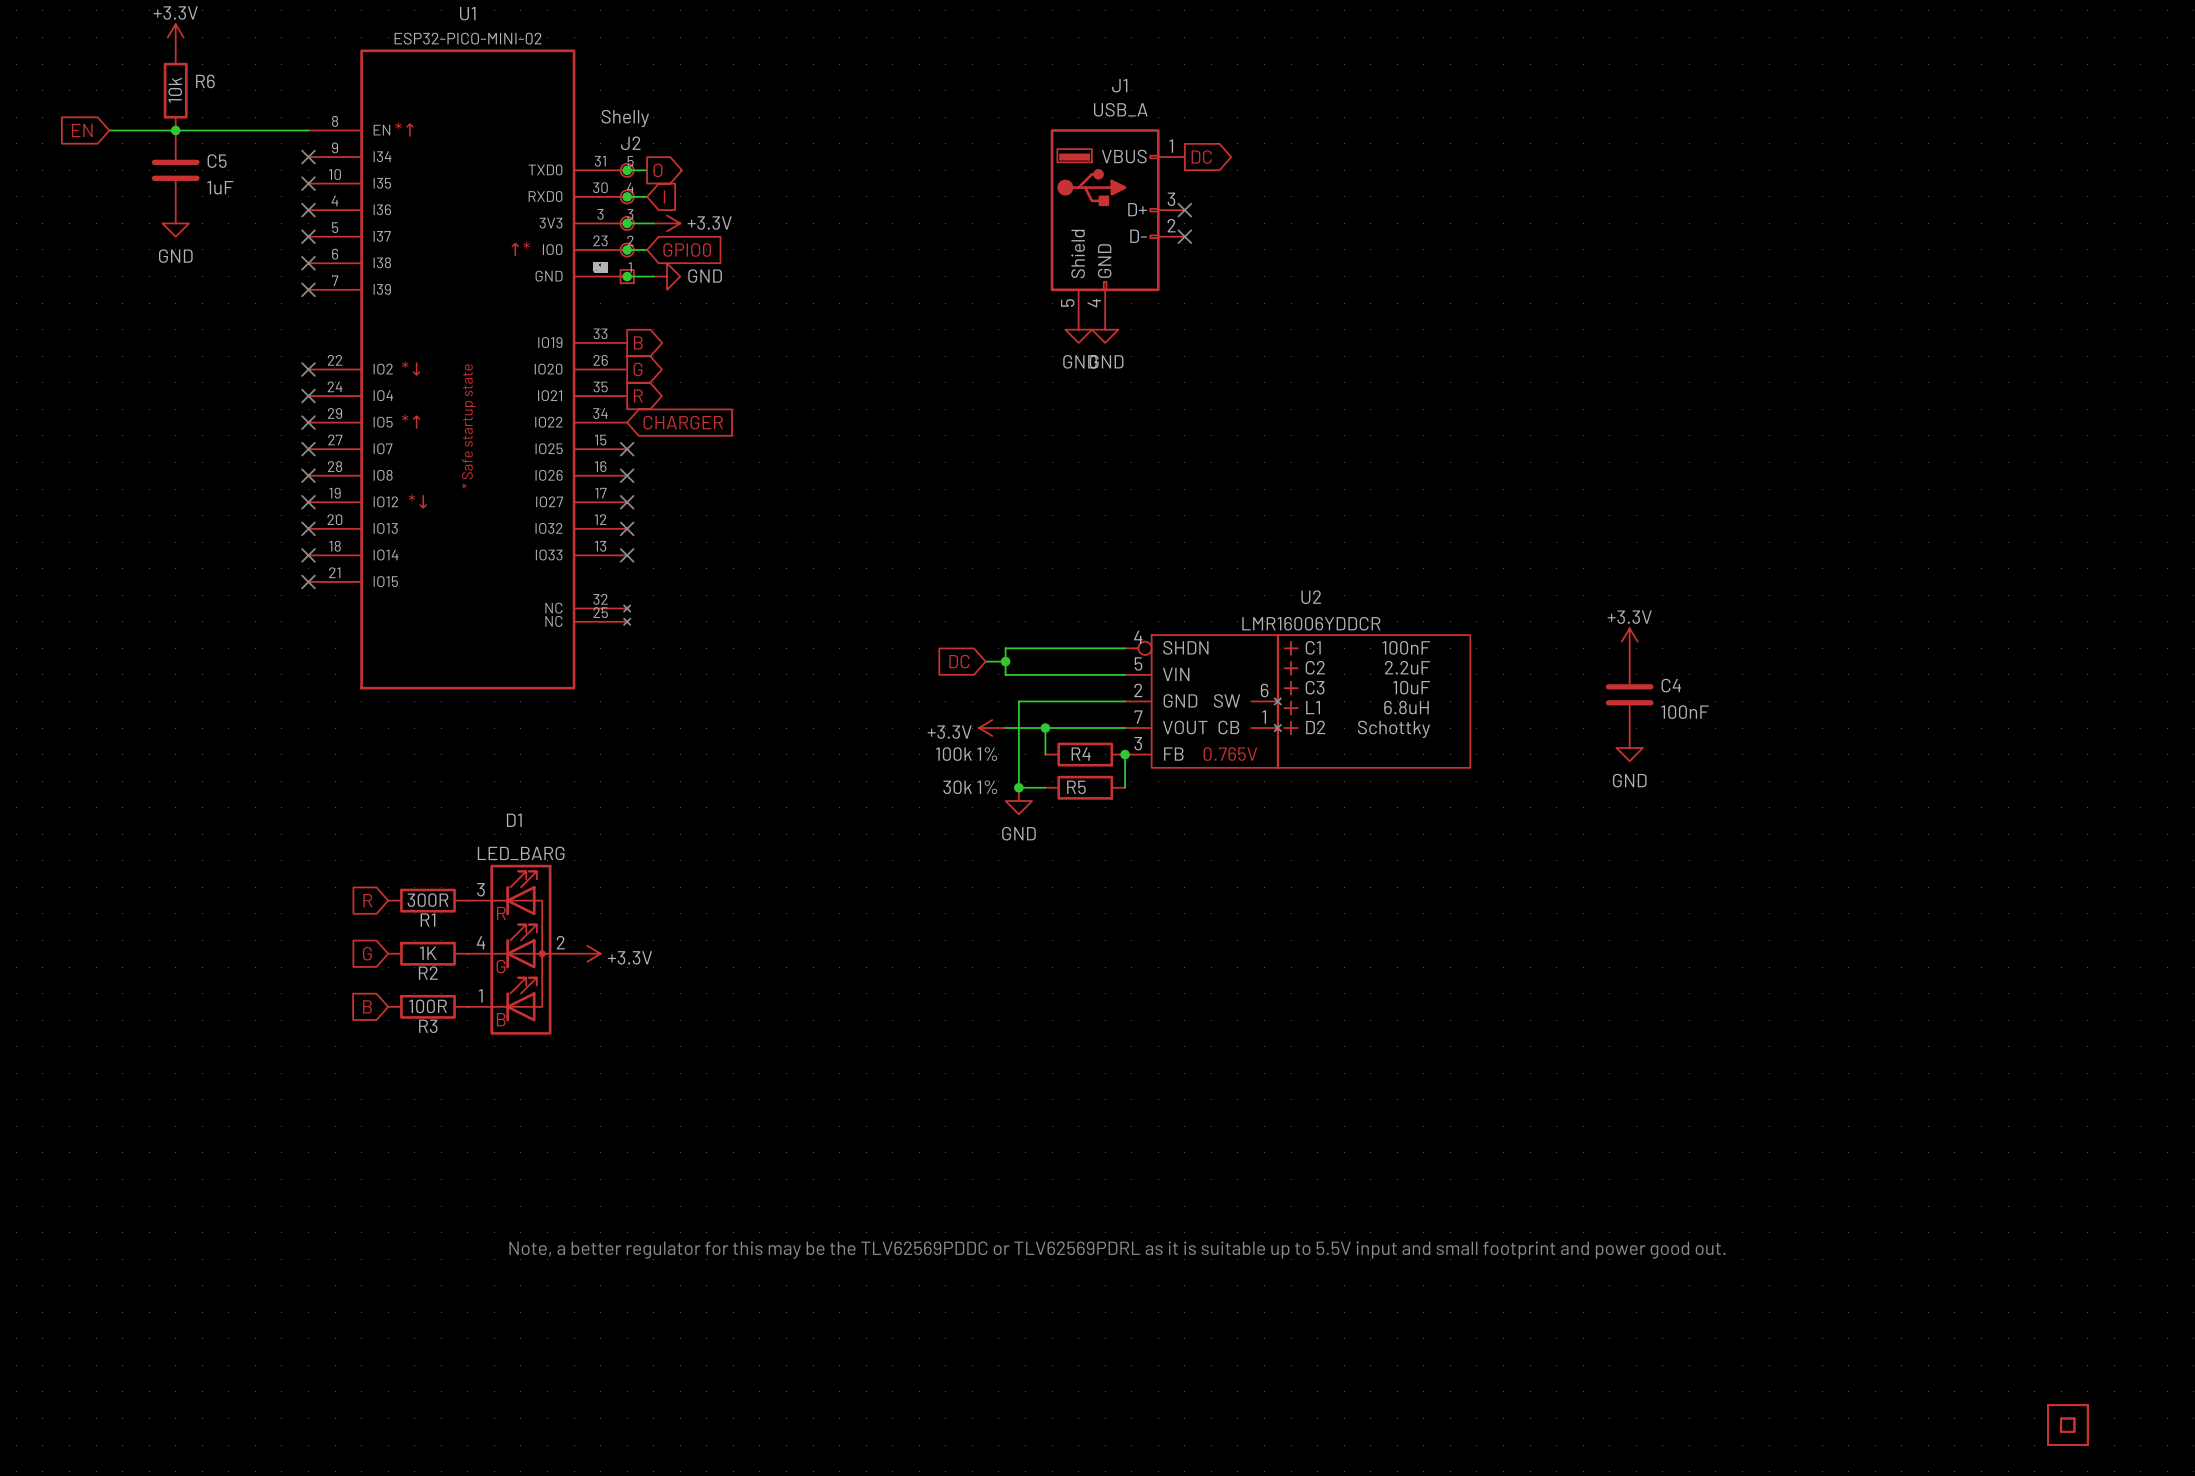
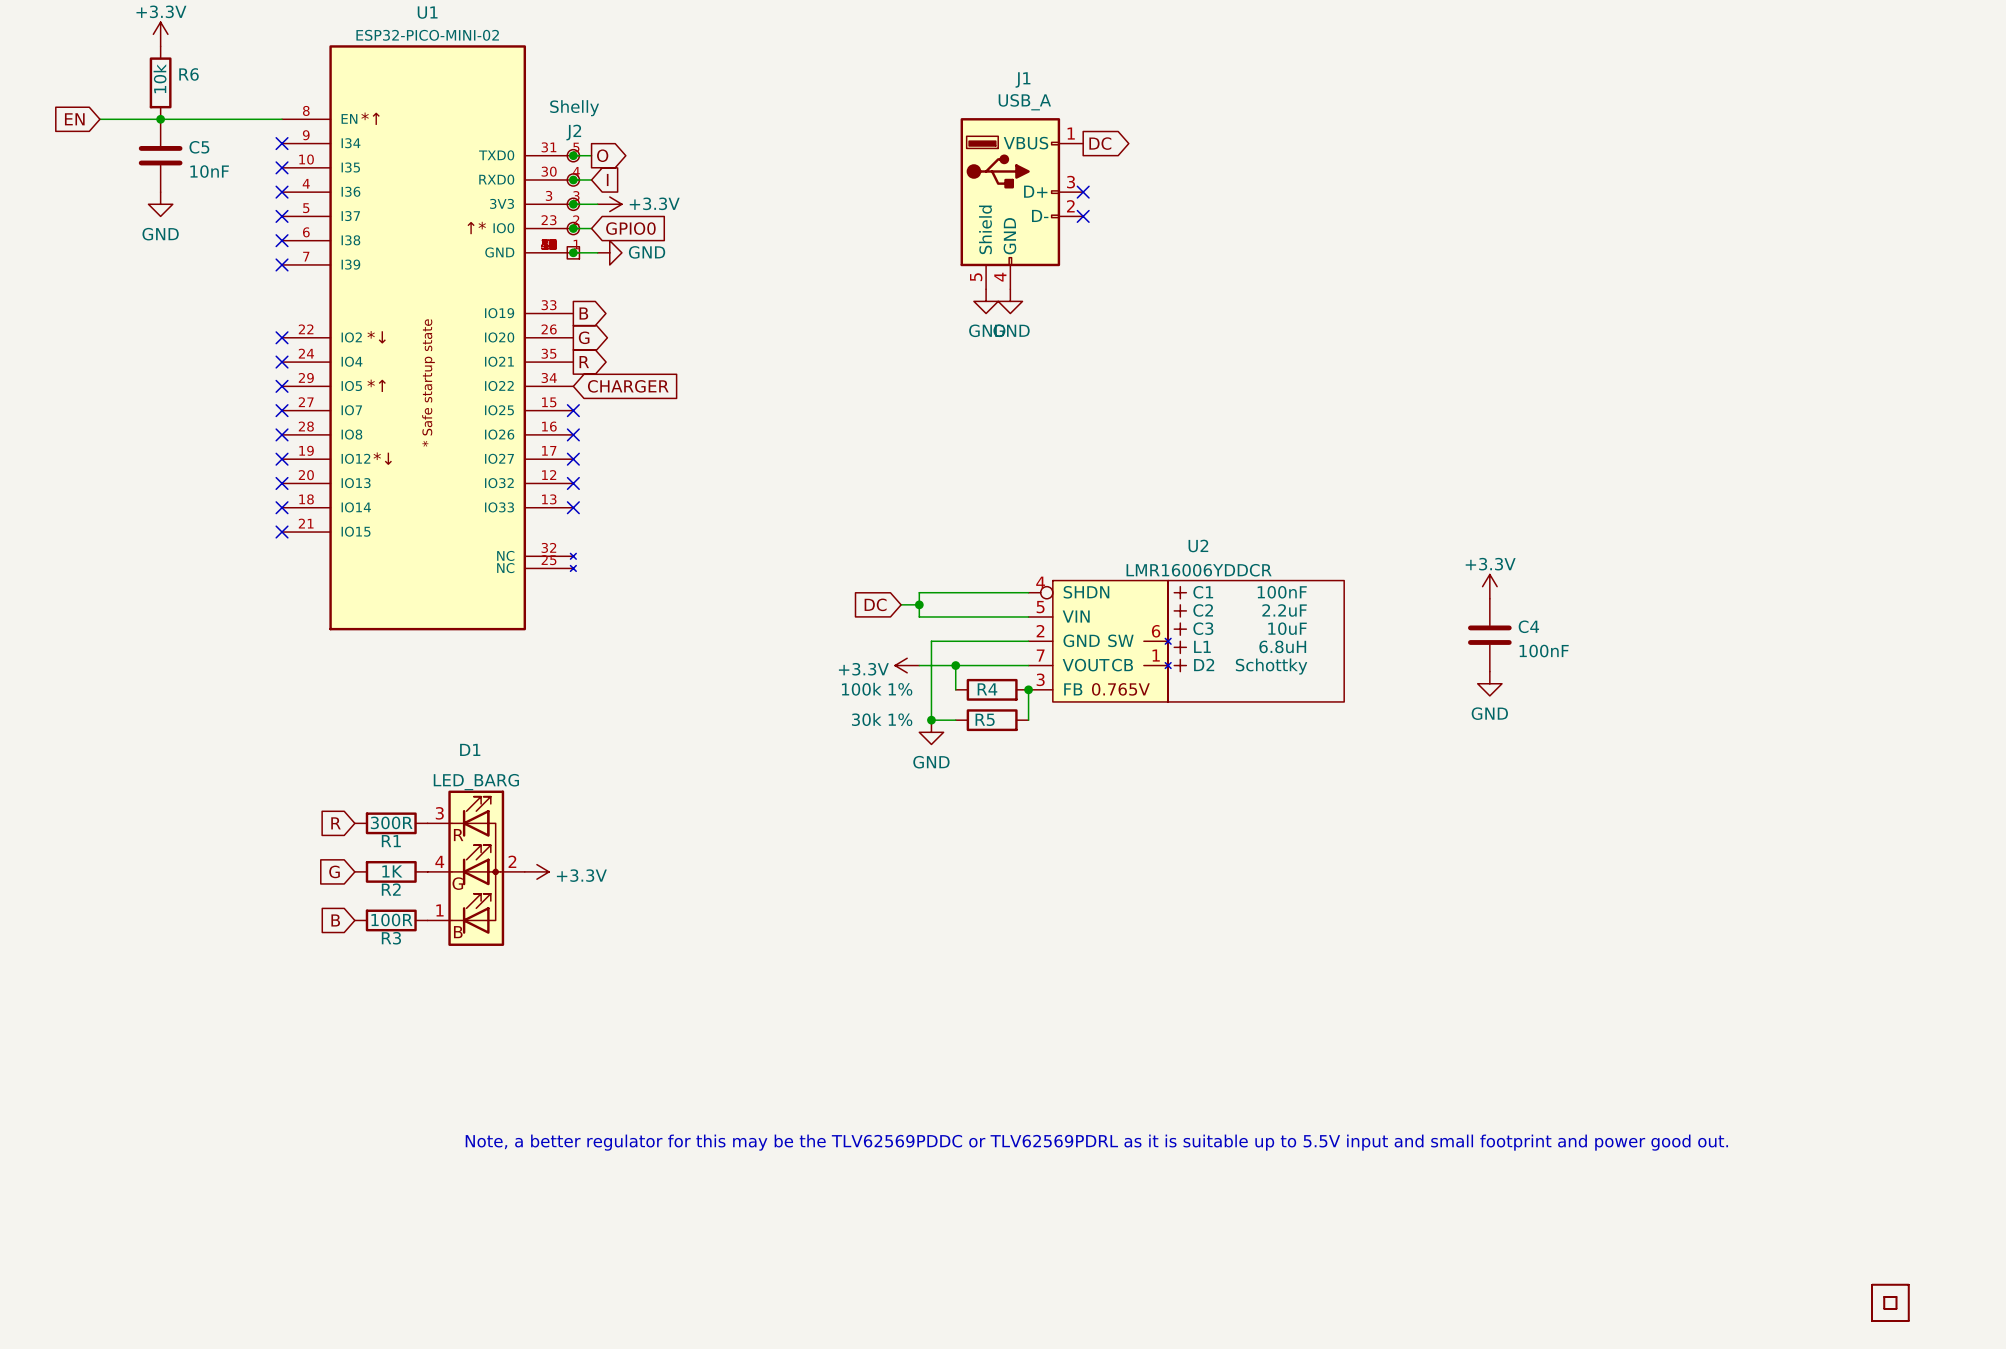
C5 value: 1uF (220, 187) -> 10nF (209, 171)

